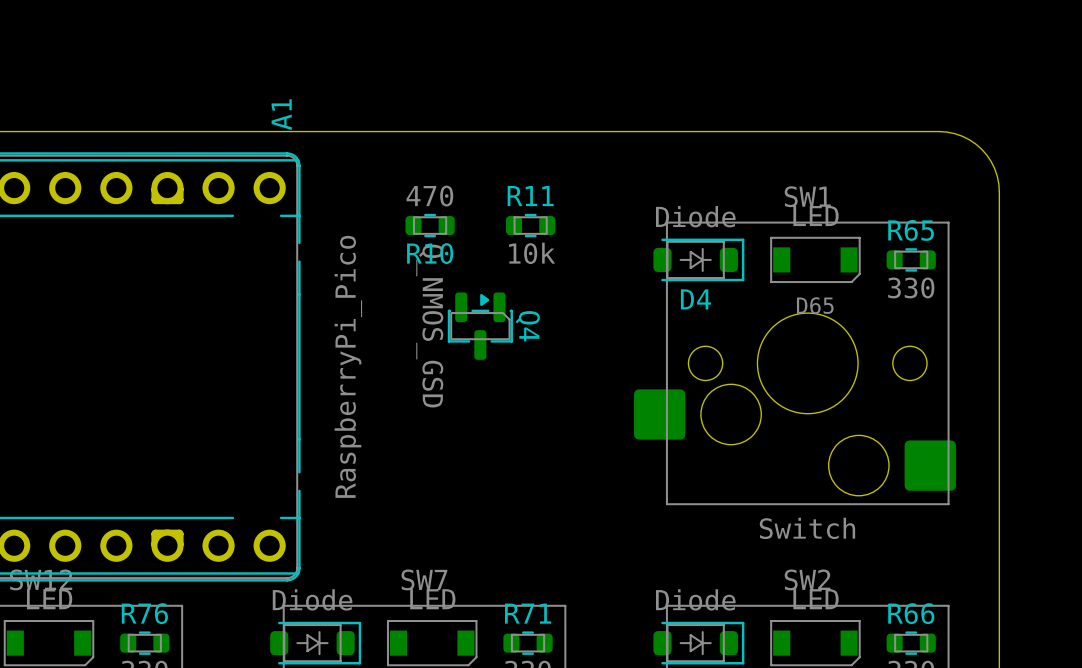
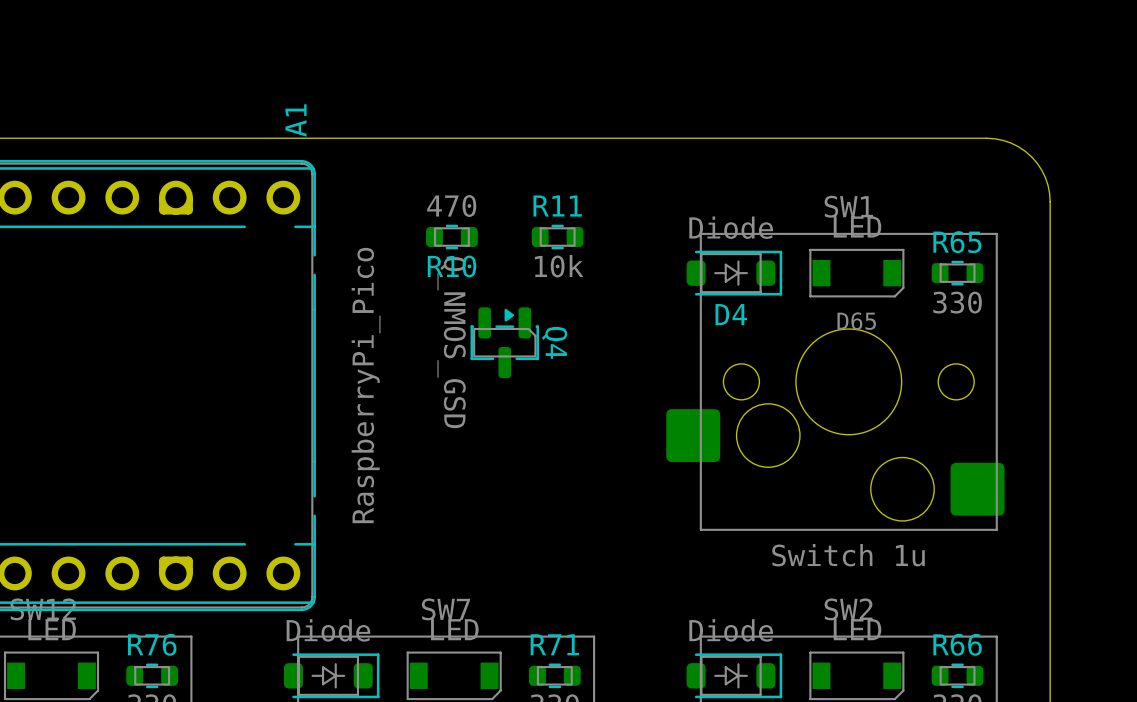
SW1 value: Switch (807, 528) -> Switch 1u (848, 555)

